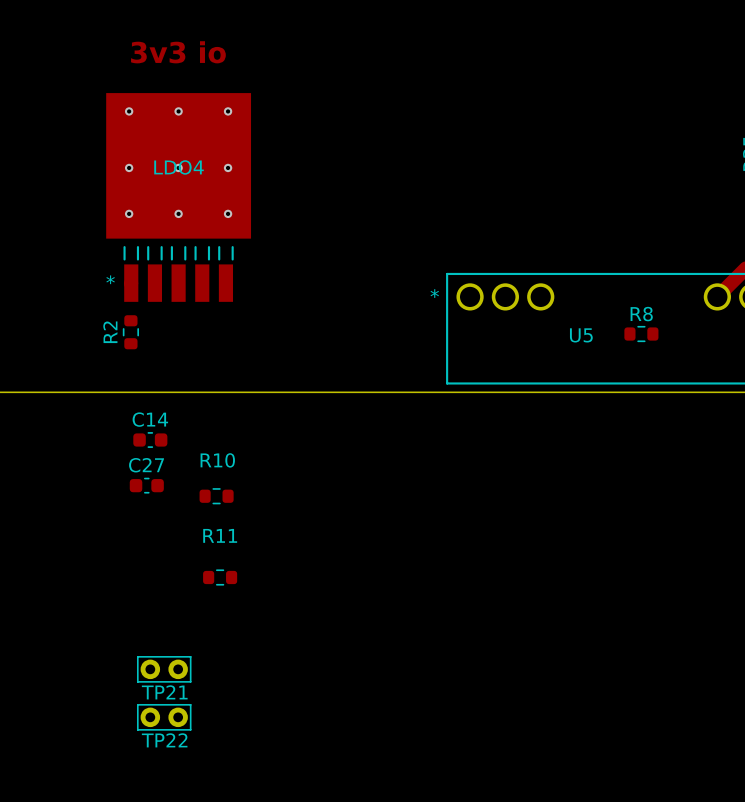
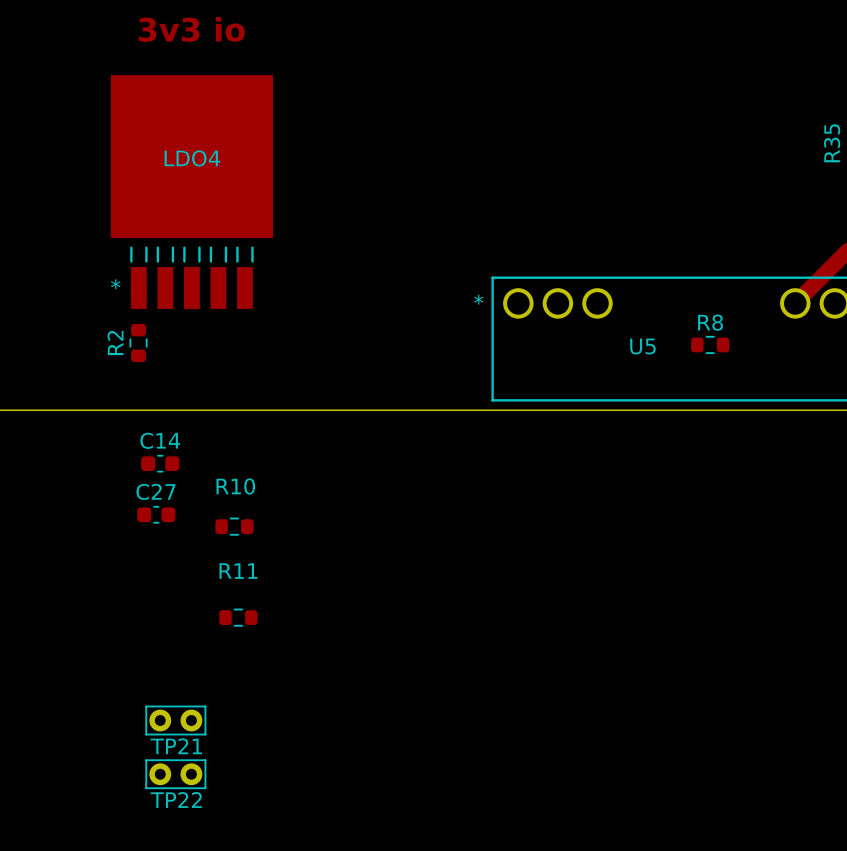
via: (129, 111) -> none
via: (178, 111) -> none
via: (228, 111) -> none
via: (129, 167) -> none
via: (178, 167) -> none
via: (228, 167) -> none
via: (129, 213) -> none
via: (178, 213) -> none
via: (228, 213) -> none

